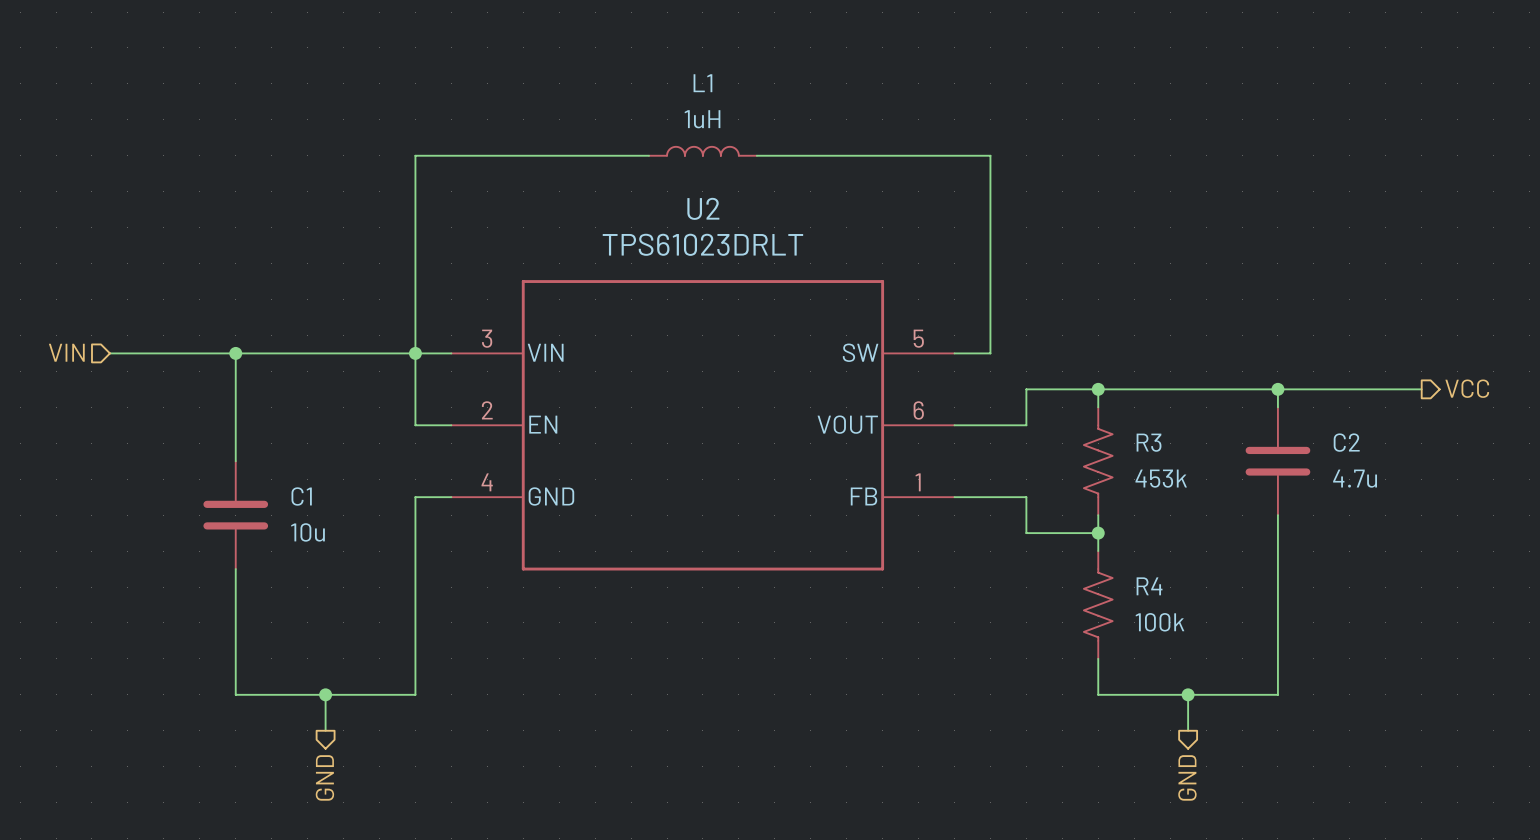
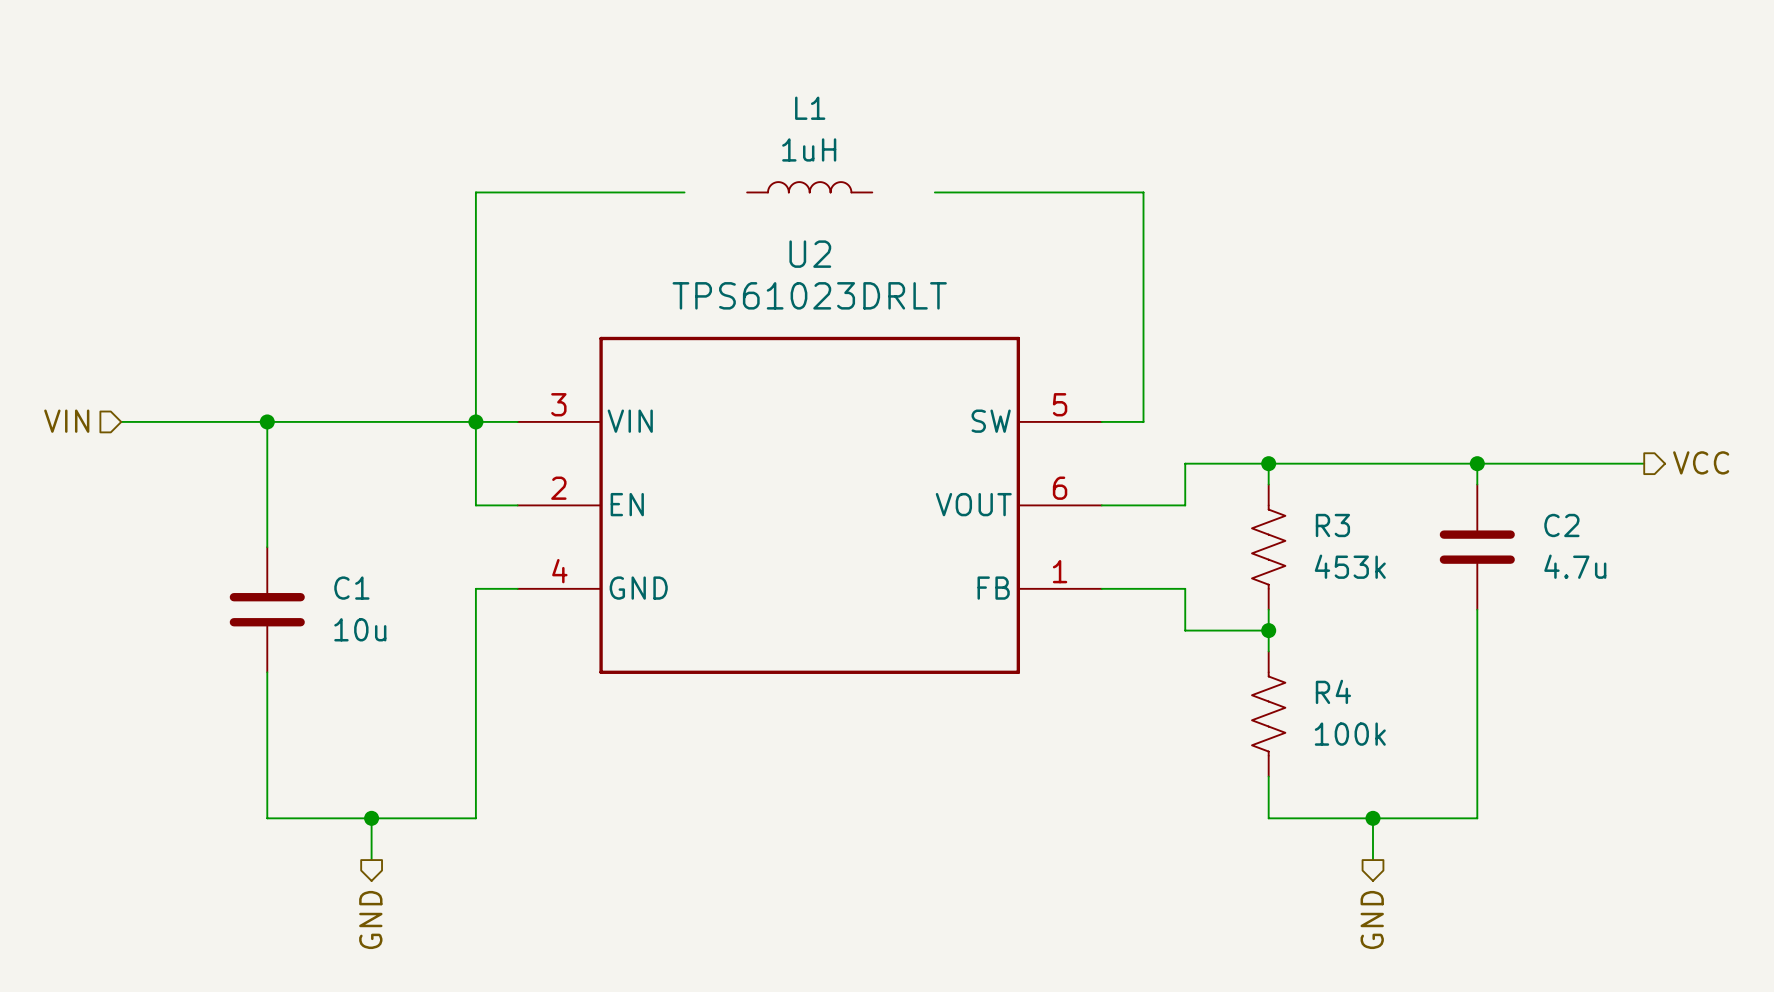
wire: (595, 155) (649, 155) -> none
wire: (756, 155) (810, 155) -> none

